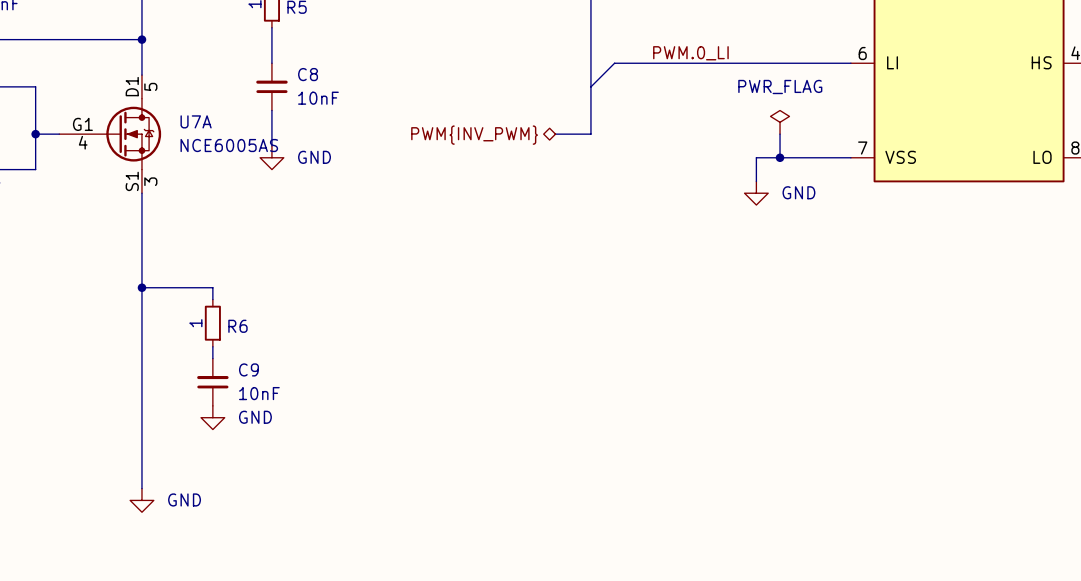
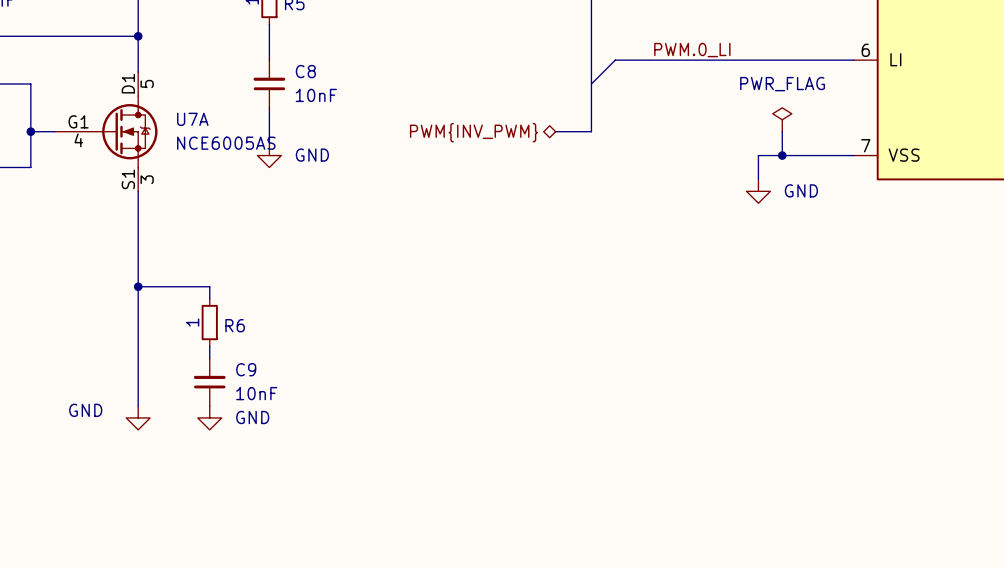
wire: (141, 405) (141, 488) -> none
power symbol text position: GND (184, 499) -> GND (85, 410)
power symbol position: GND (141, 500) -> GND (138, 417)

